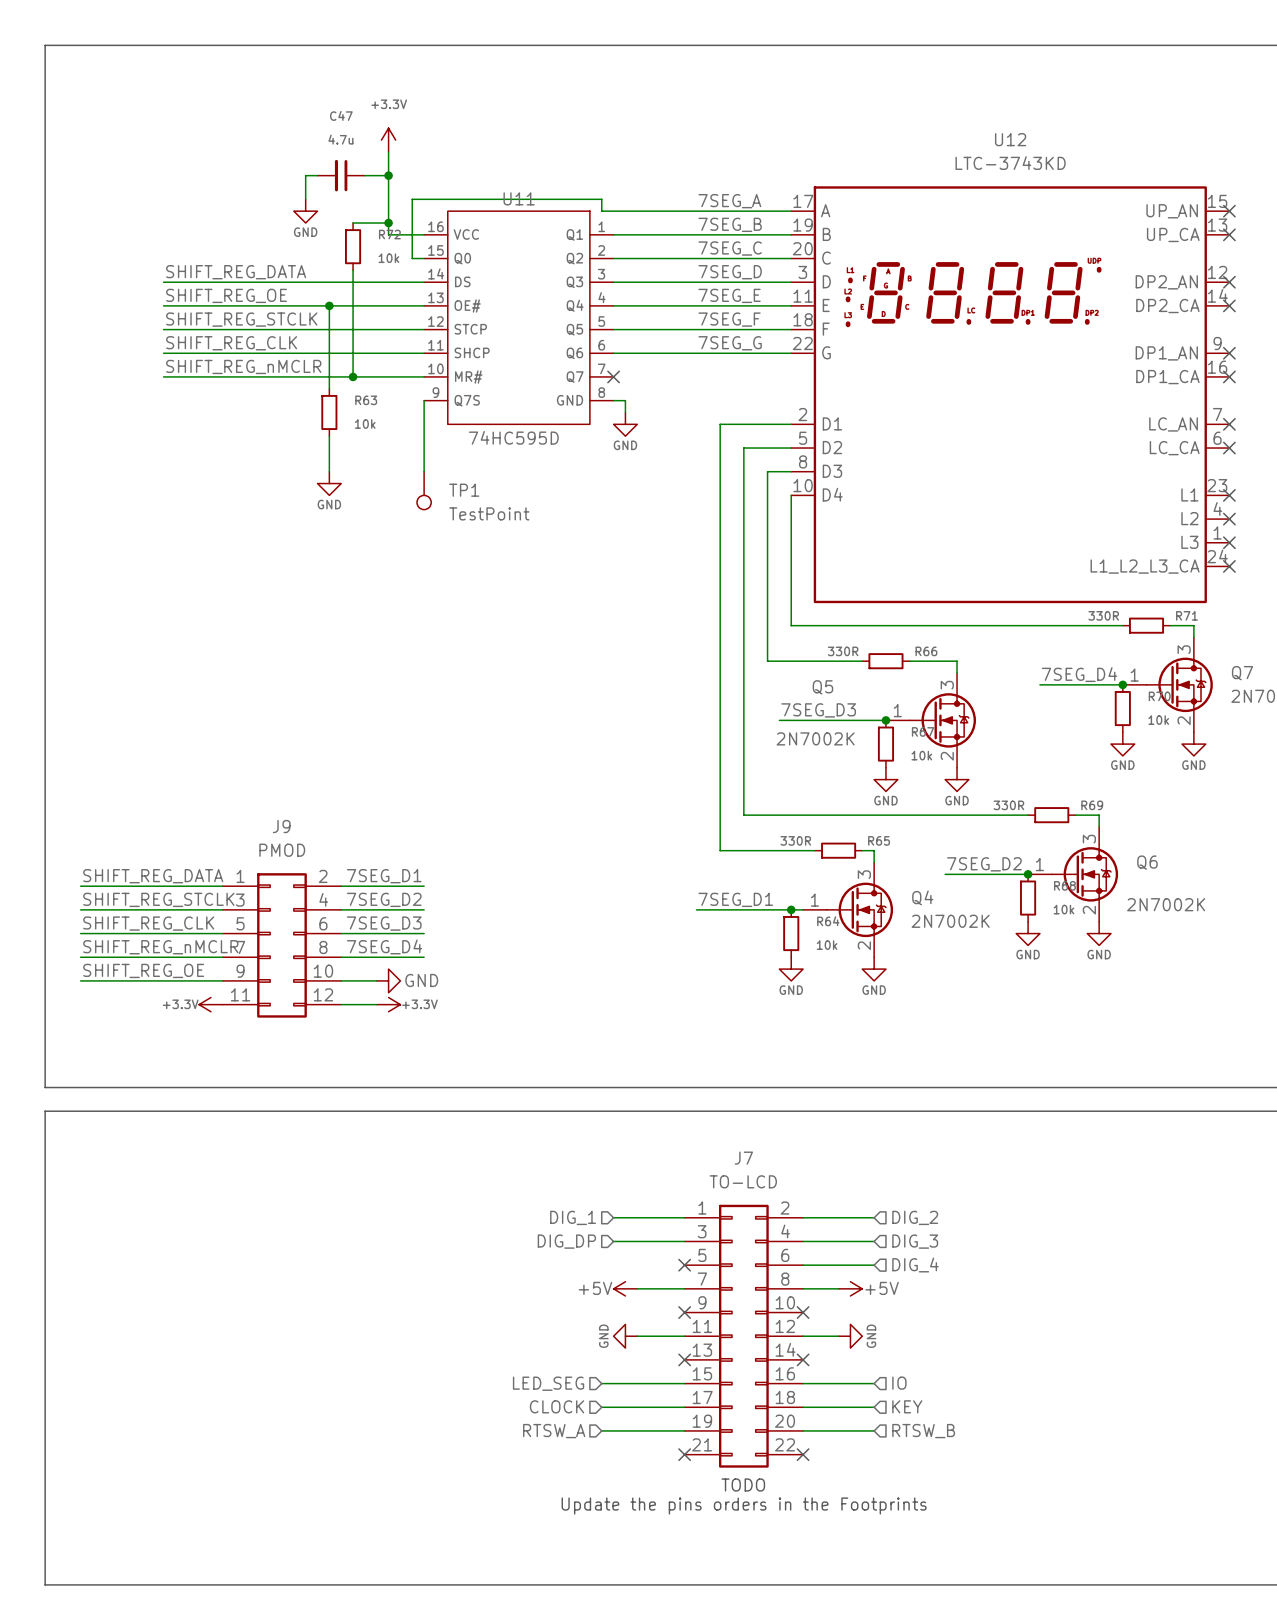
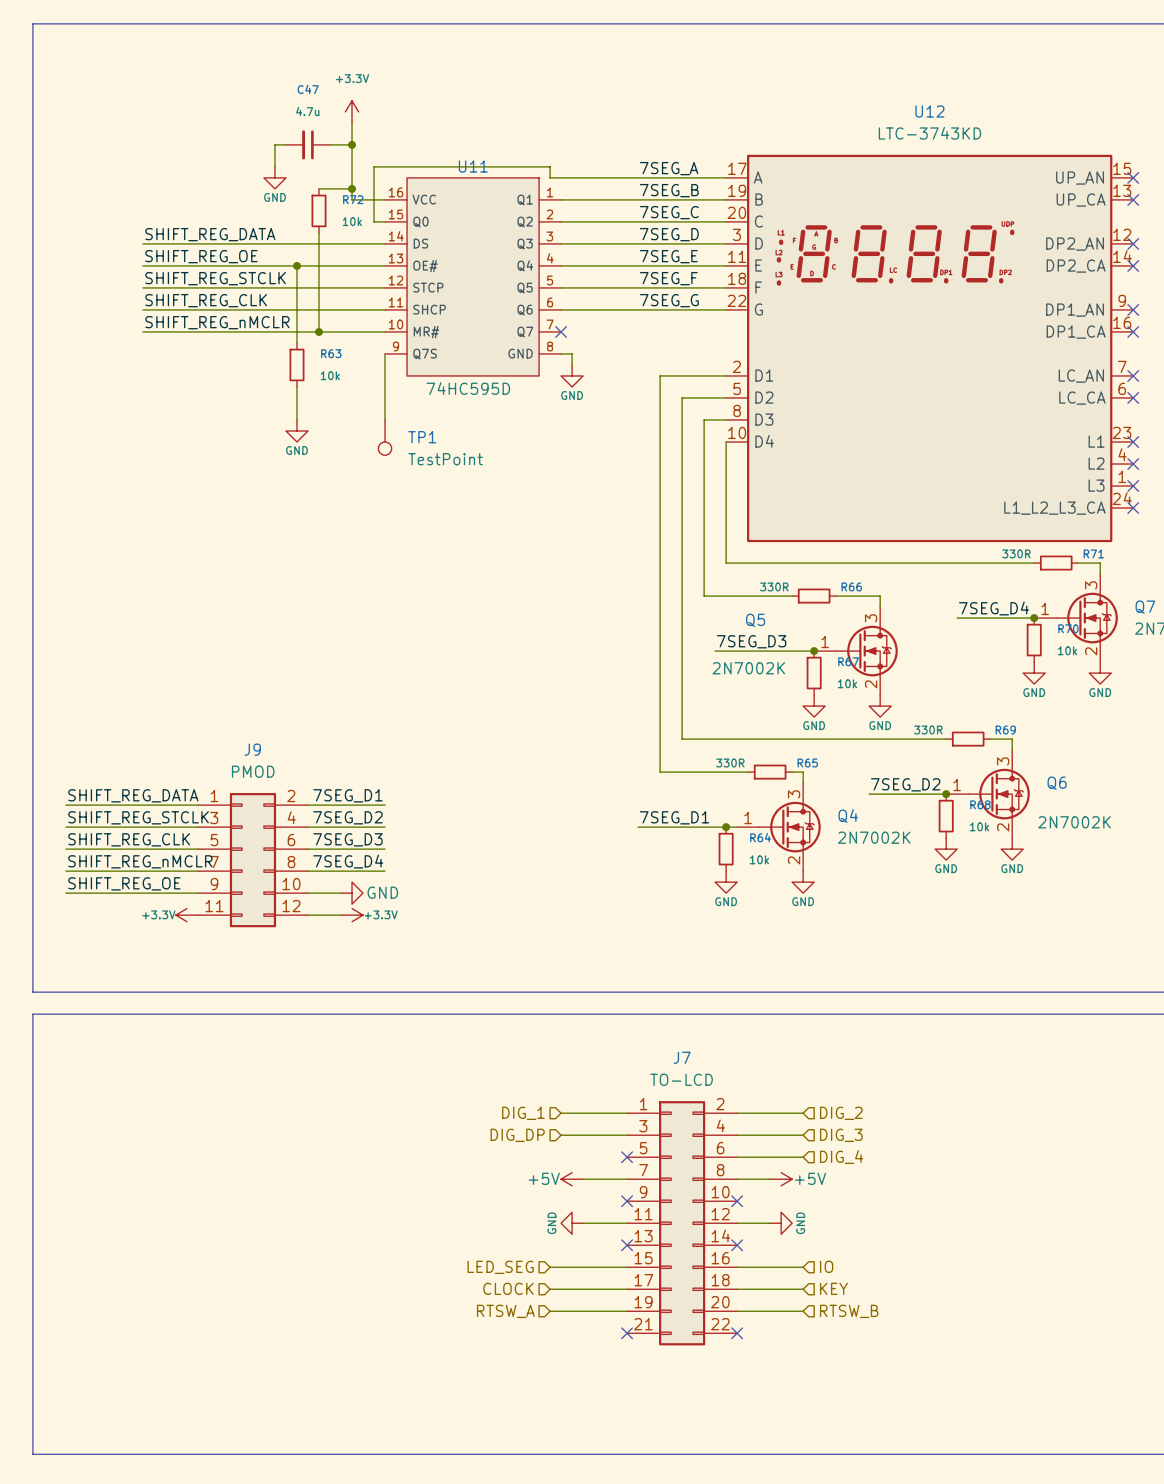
text: TODO (743, 1484) -> none
text: Update the pins orders in the Footprints (744, 1506) -> none

